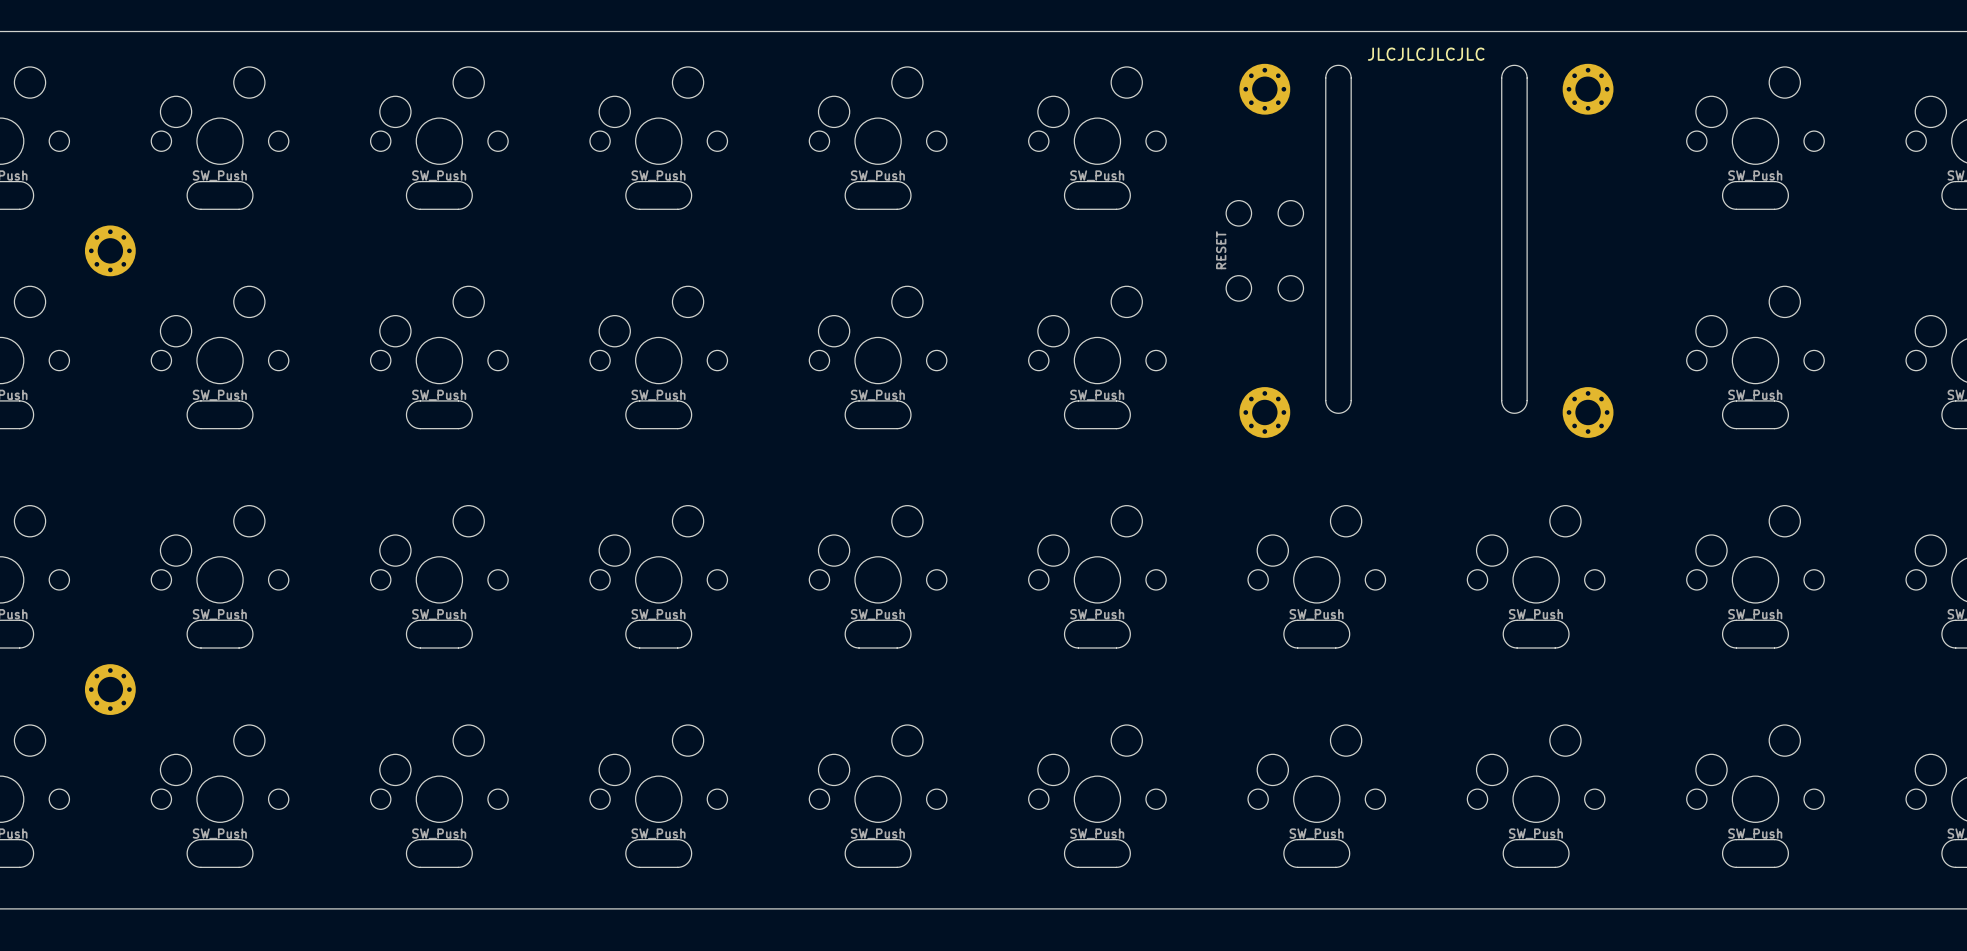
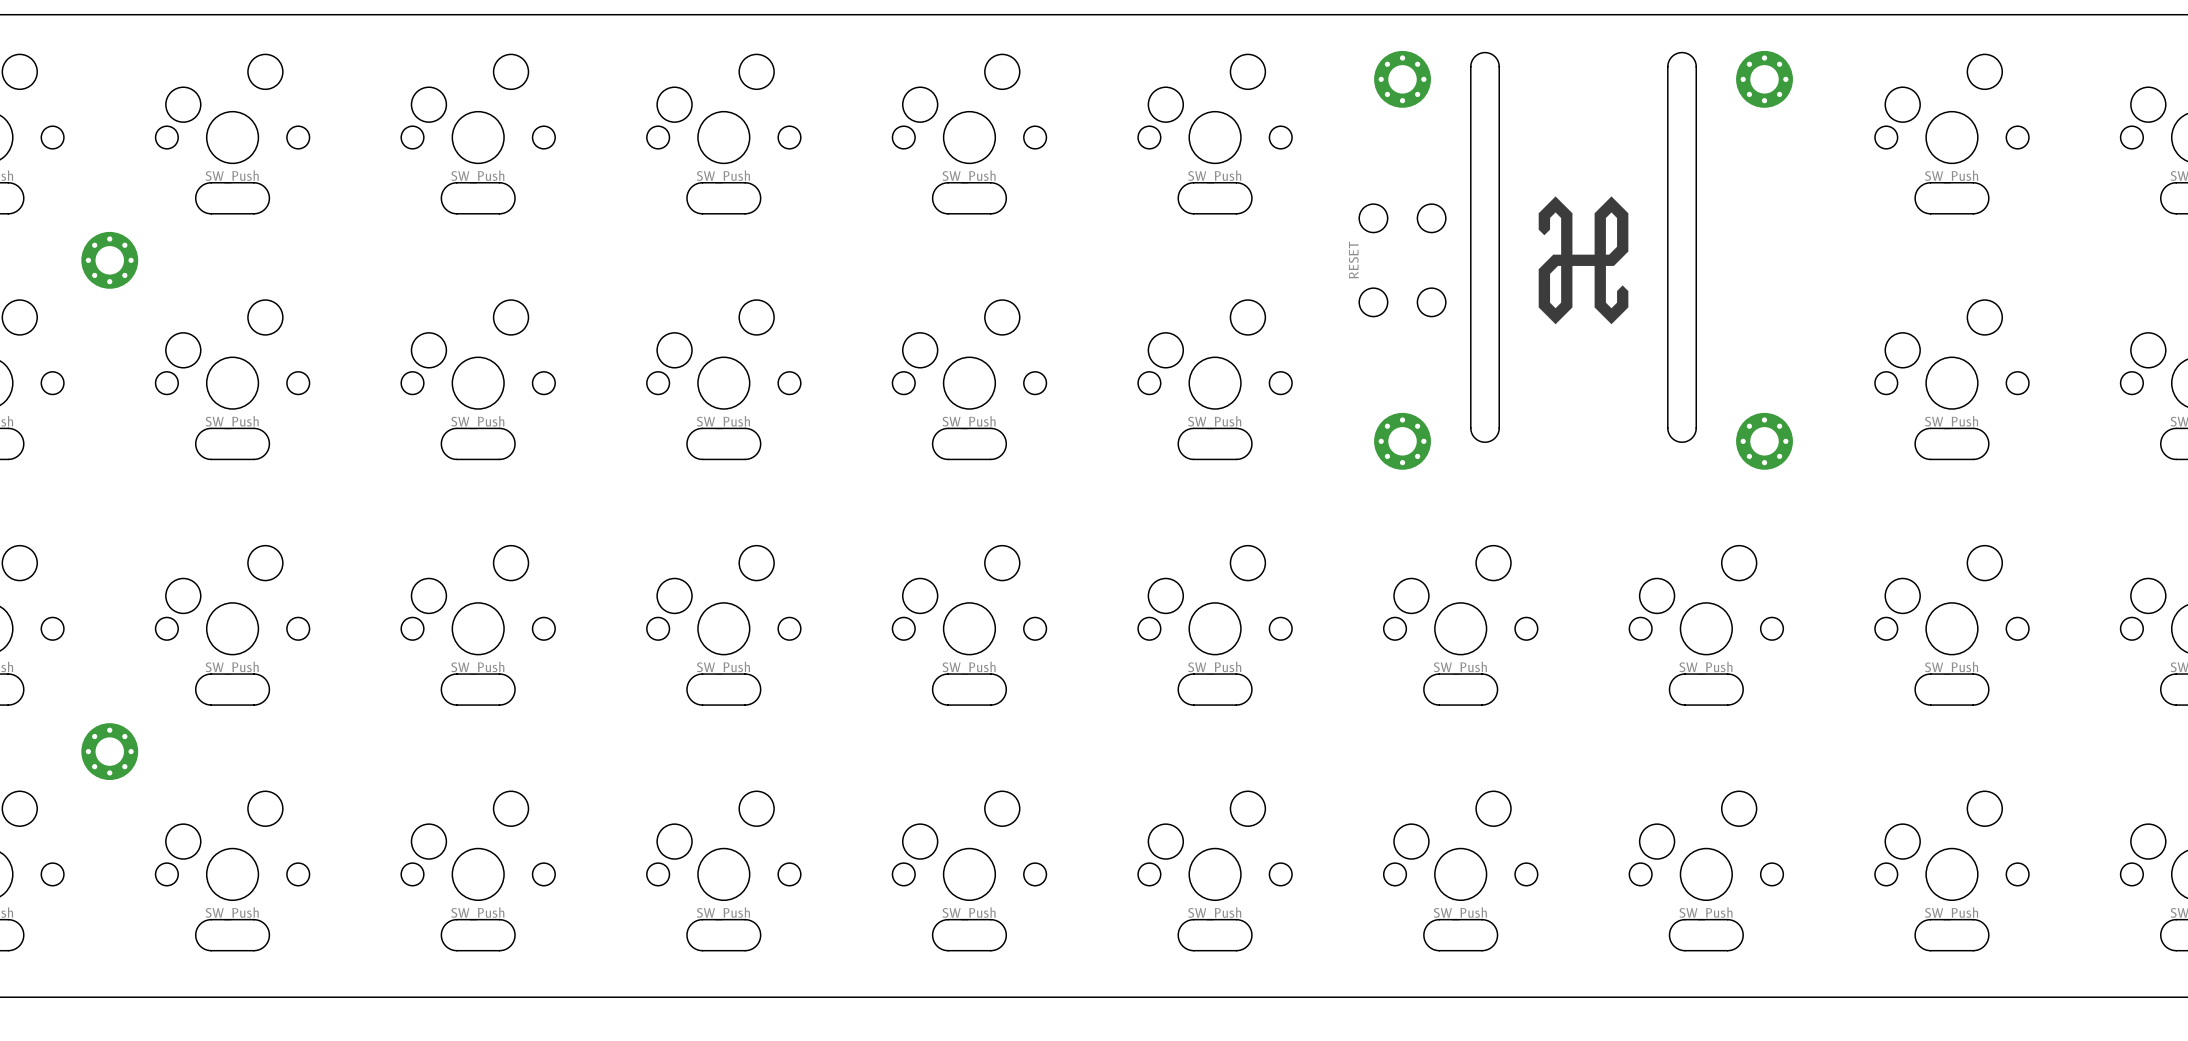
text: JLCJLCJLCJLC (1426, 54) -> none
drawing: none -> [1538, 196, 1629, 325]

